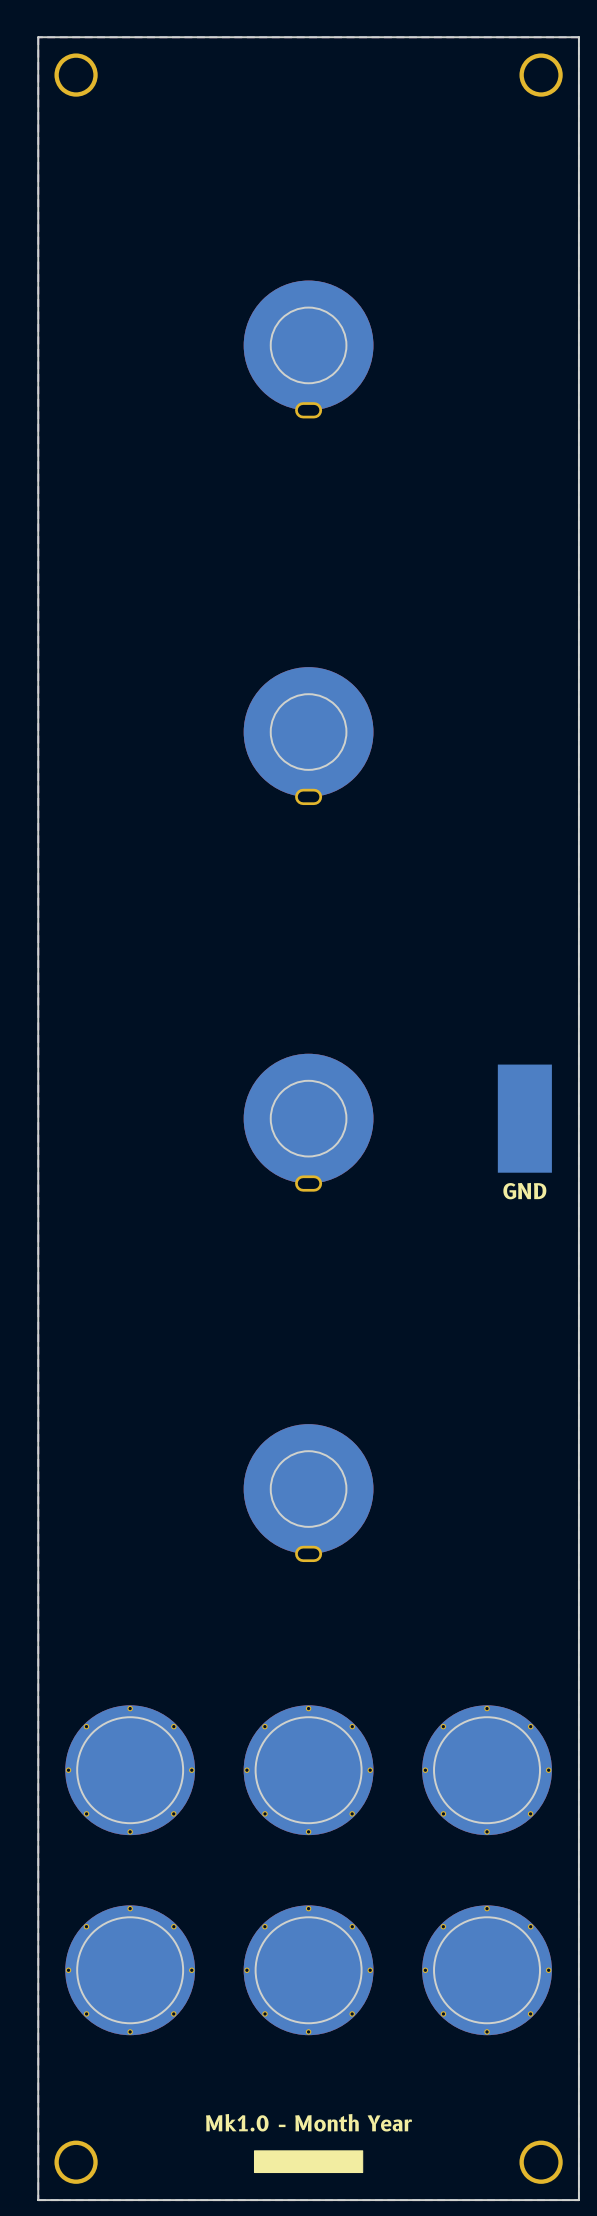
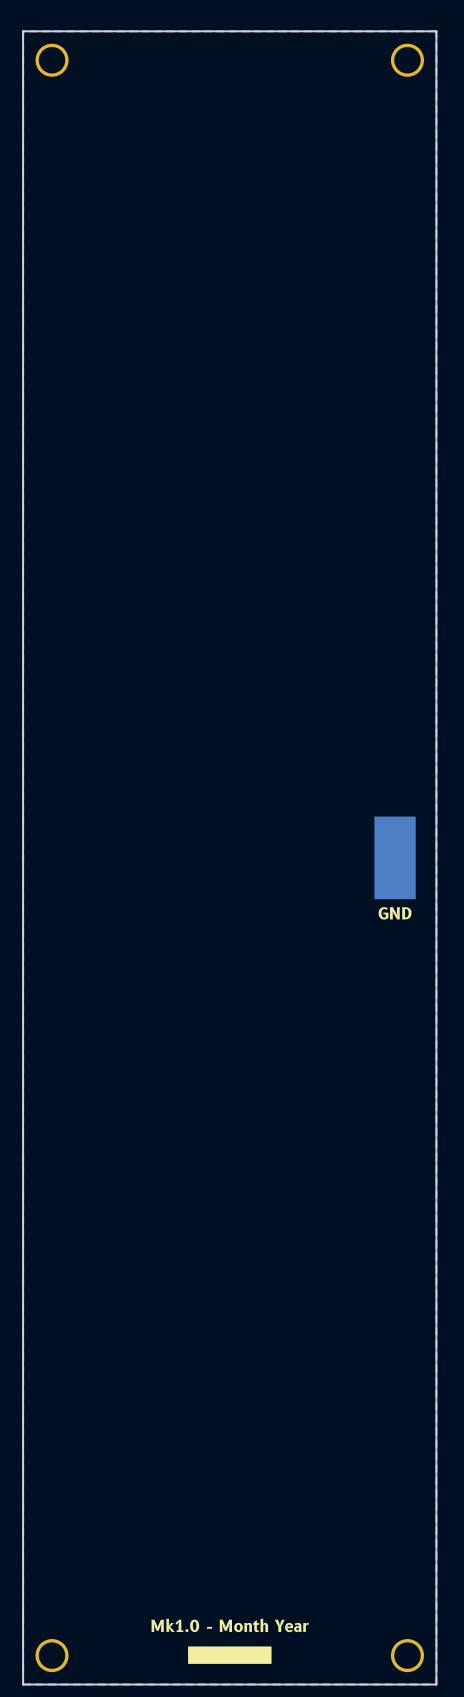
part: (308, 349) -> none
part: (308, 736) -> none
part: (308, 1122) -> none
part: (308, 1493) -> none
part: (130, 1770) -> none
part: (308, 1770) -> none
part: (487, 1770) -> none
part: (130, 1970) -> none
part: (308, 1970) -> none
part: (487, 1970) -> none

